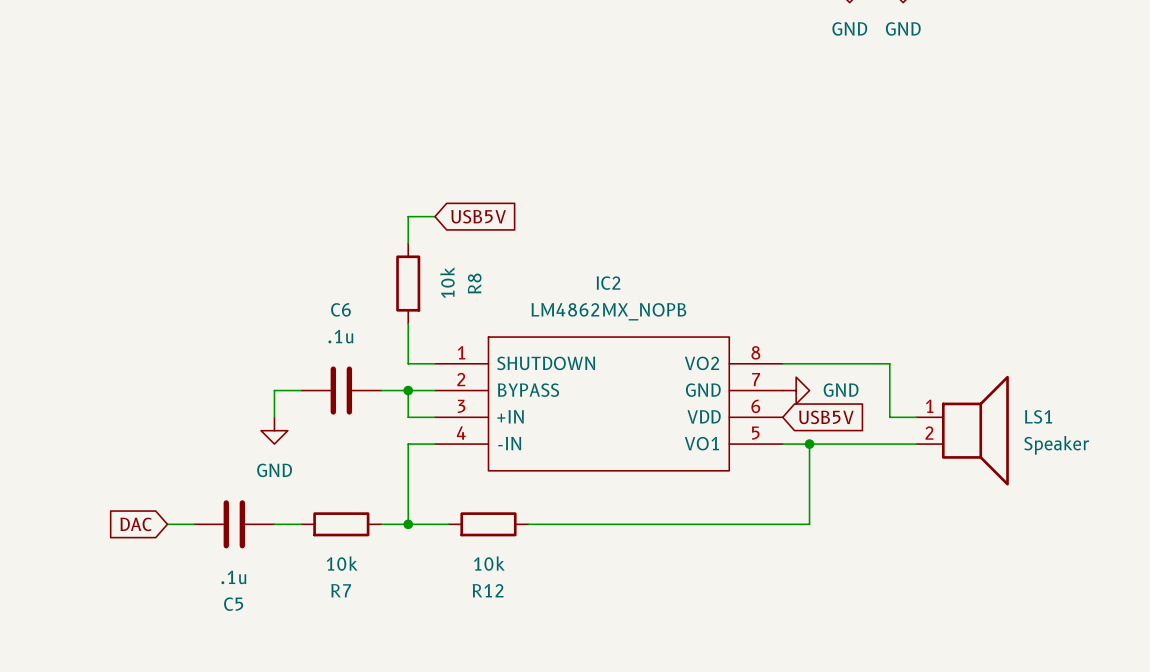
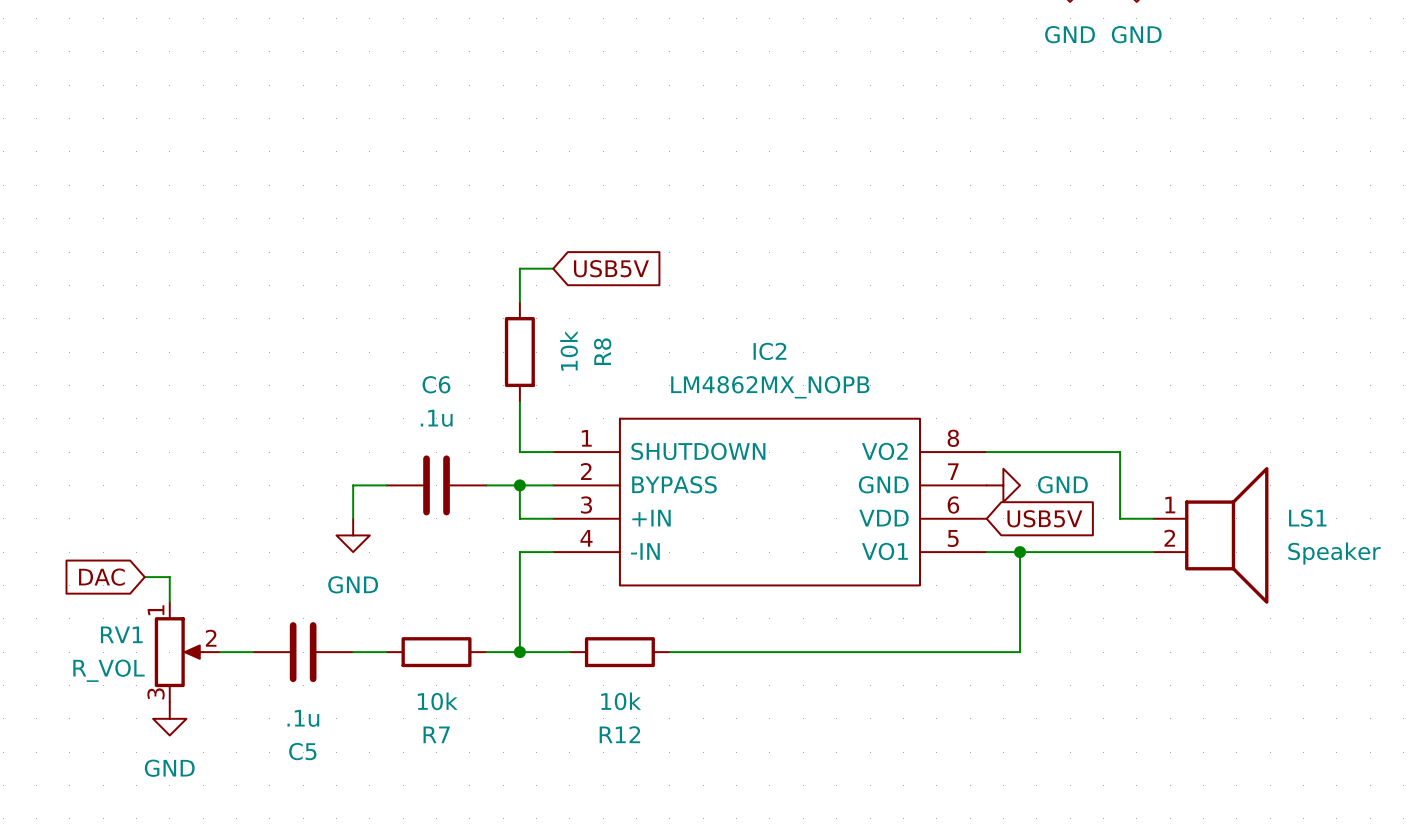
wire: none -> (144, 577) (169, 577) (169, 602)
global label position: DAC (136, 524) -> DAC (101, 577)
RV1: none -> R_VOL (187, 652)
power symbol: none -> GND (169, 718)

